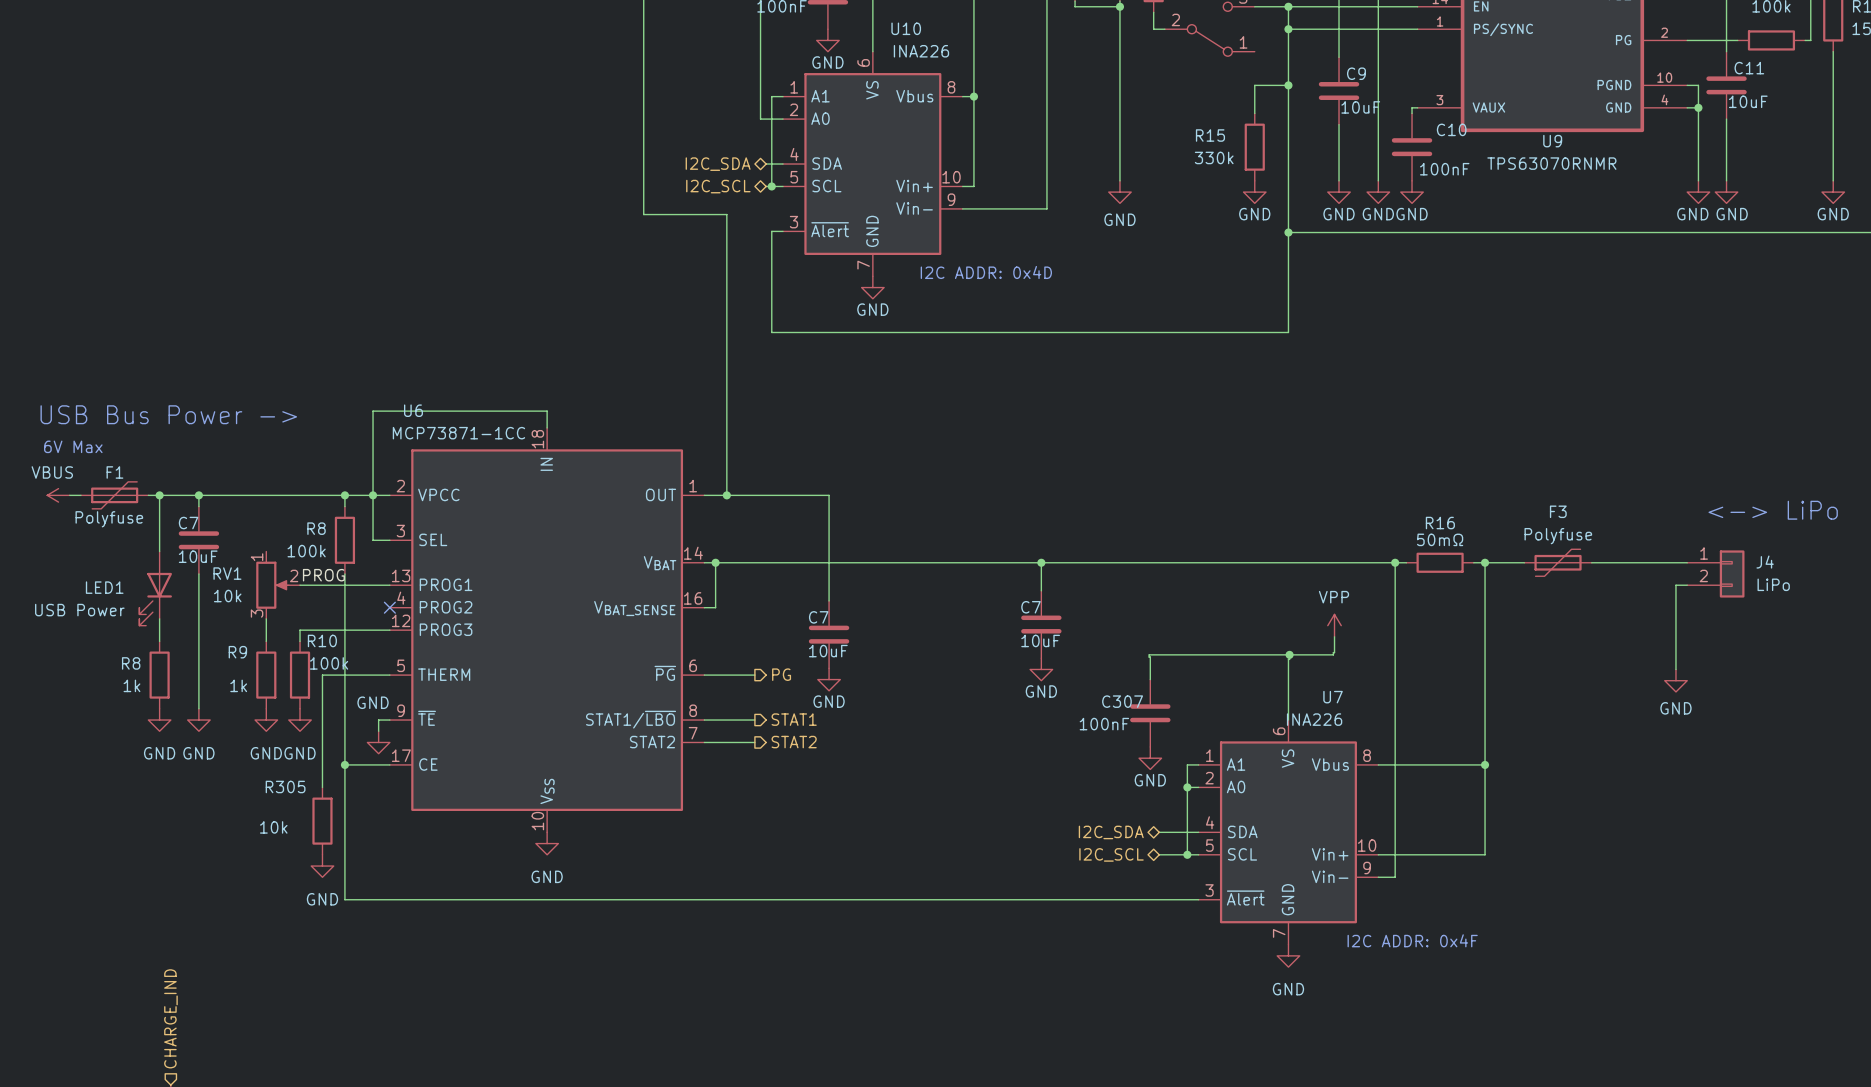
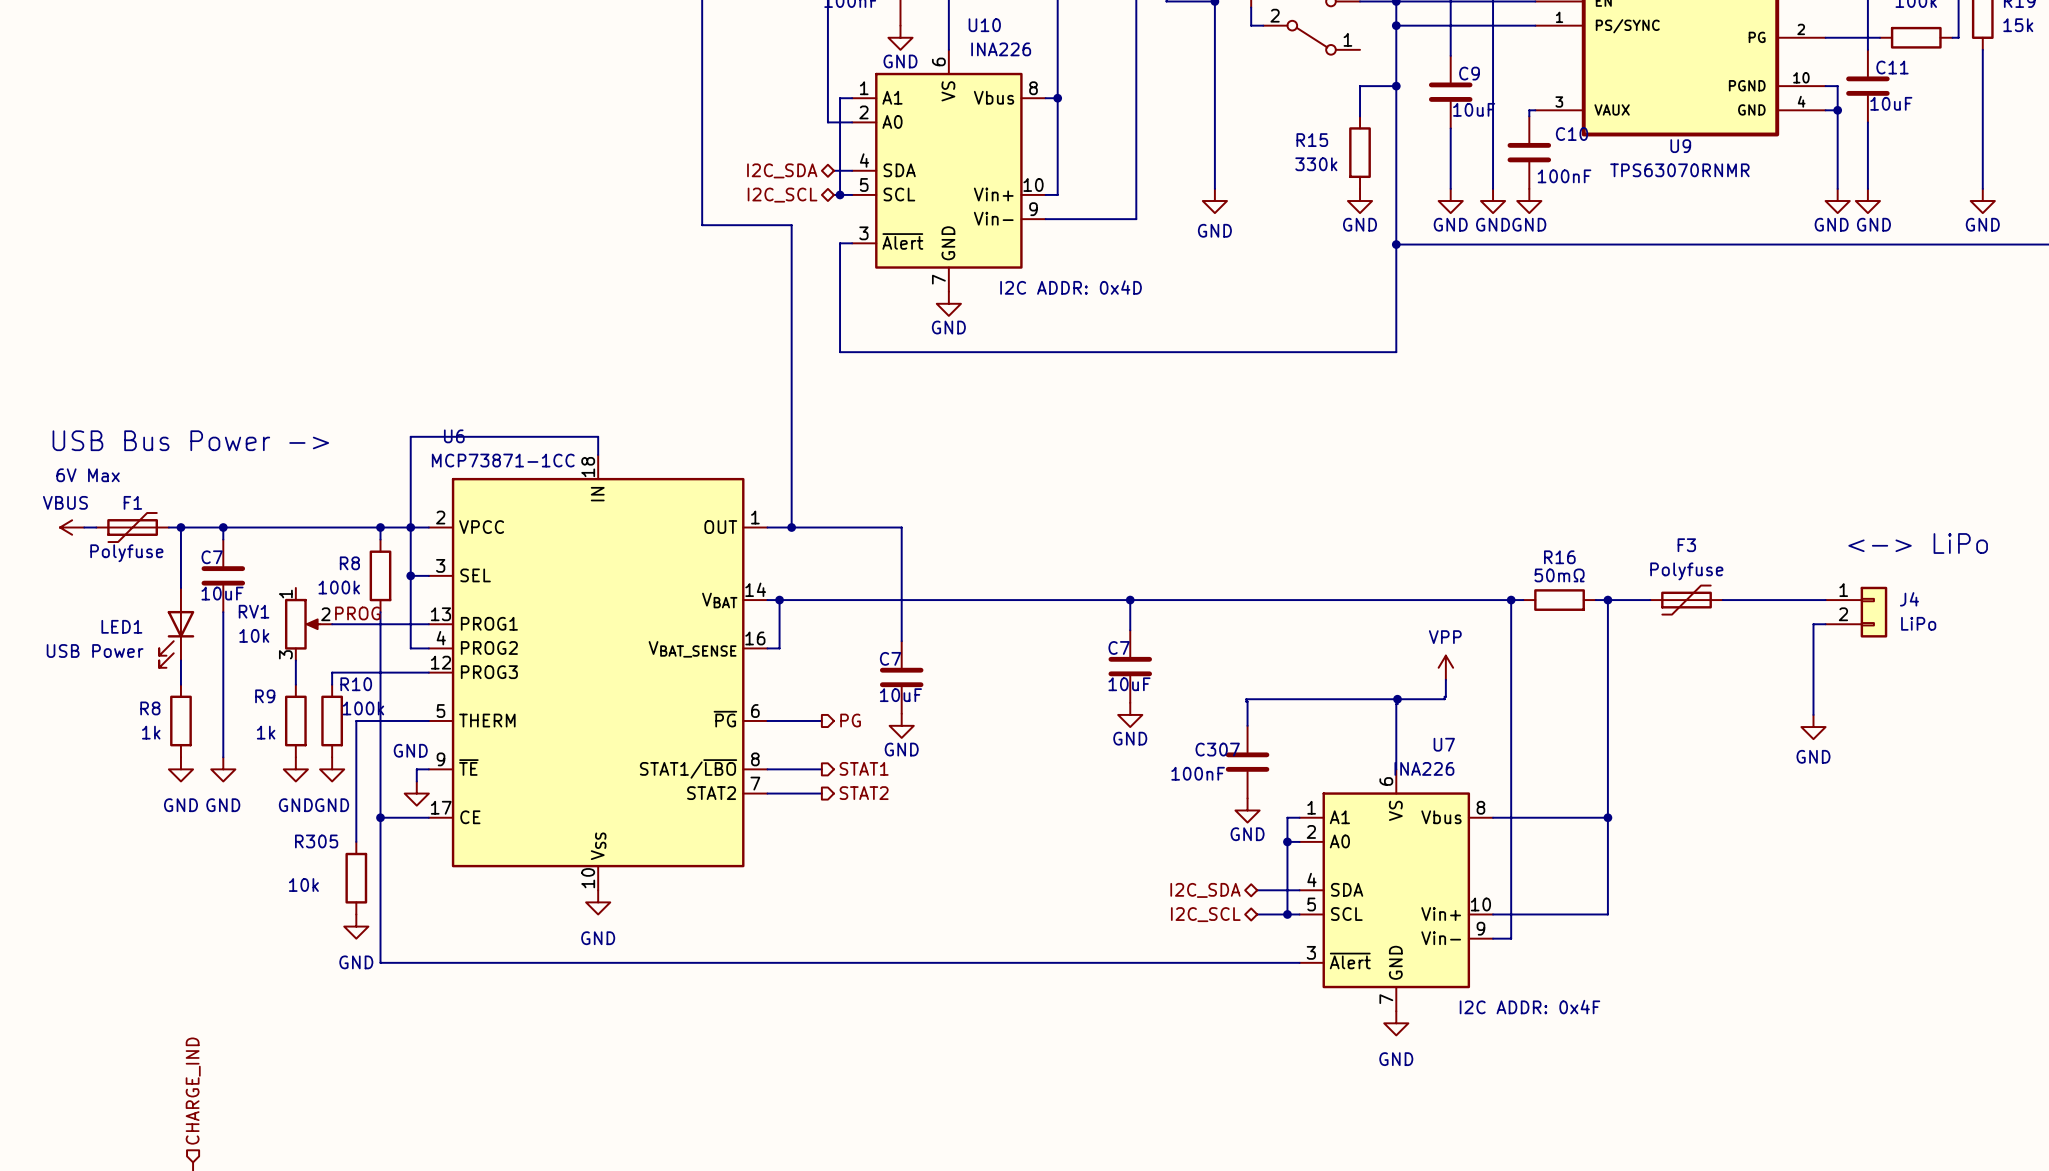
wire: none -> (410, 575) (410, 648) (428, 648)
junction: none -> (410, 575)
no-connect mark: (389, 607) -> none

